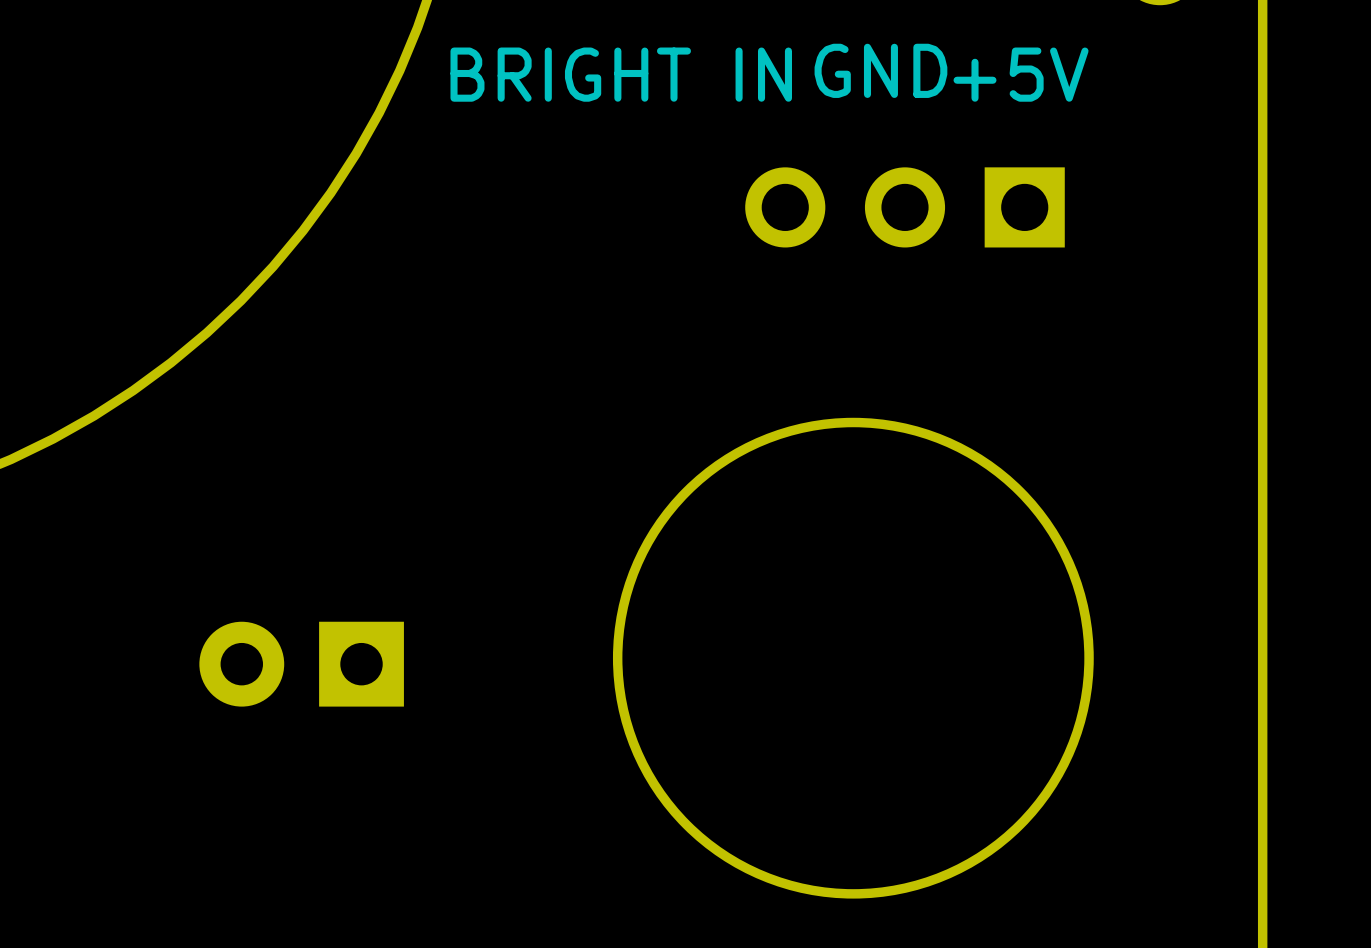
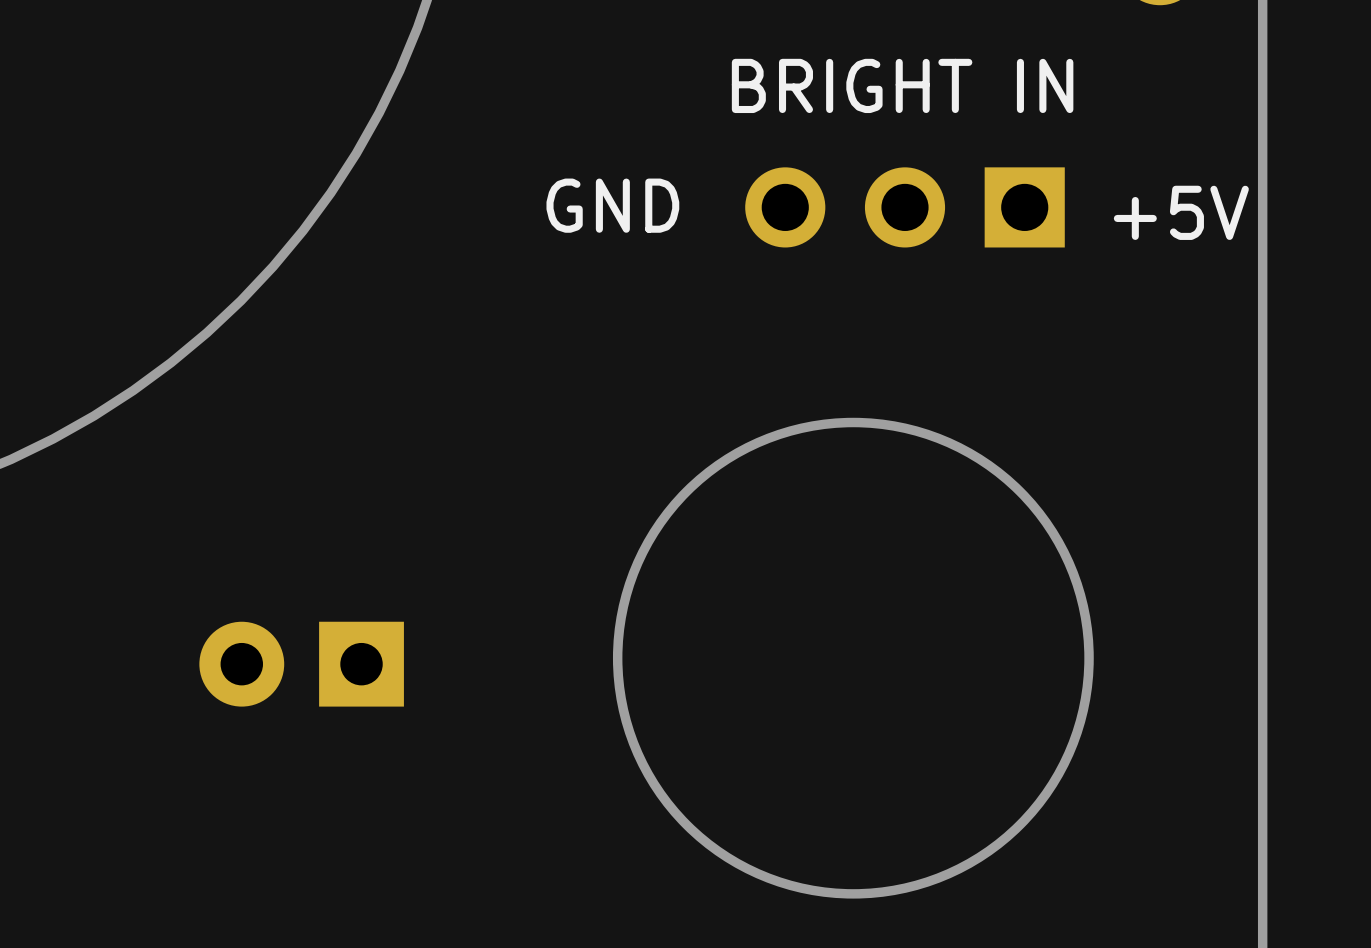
text position: GND (880, 70) -> GND (612, 205)
text position: BRIGHT IN (621, 74) -> BRIGHT IN (902, 85)
text position: +5V (1021, 74) -> +5V (1181, 212)

